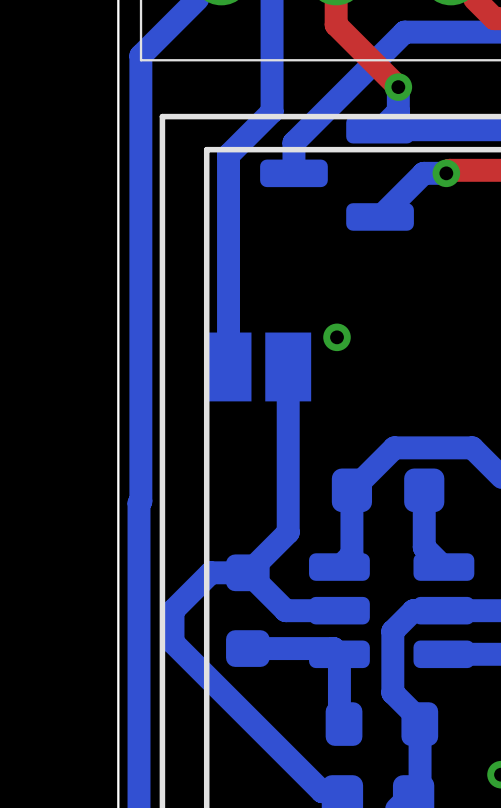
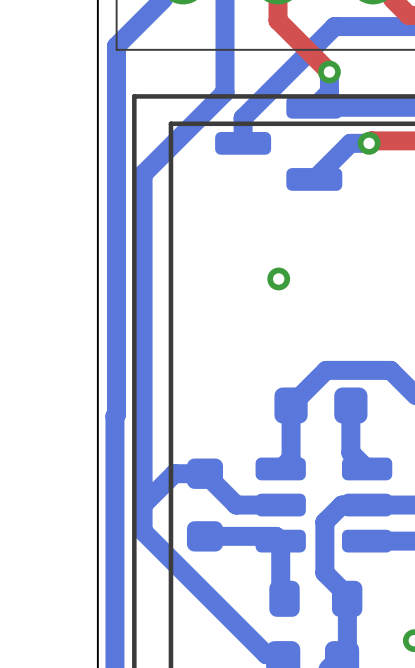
bottom track: (228, 155) (228, 366) -> (188, 128) (143, 174) (143, 505)
part: (258, 366) -> none
bottom track: (288, 366) (288, 532) (247, 572) -> none

